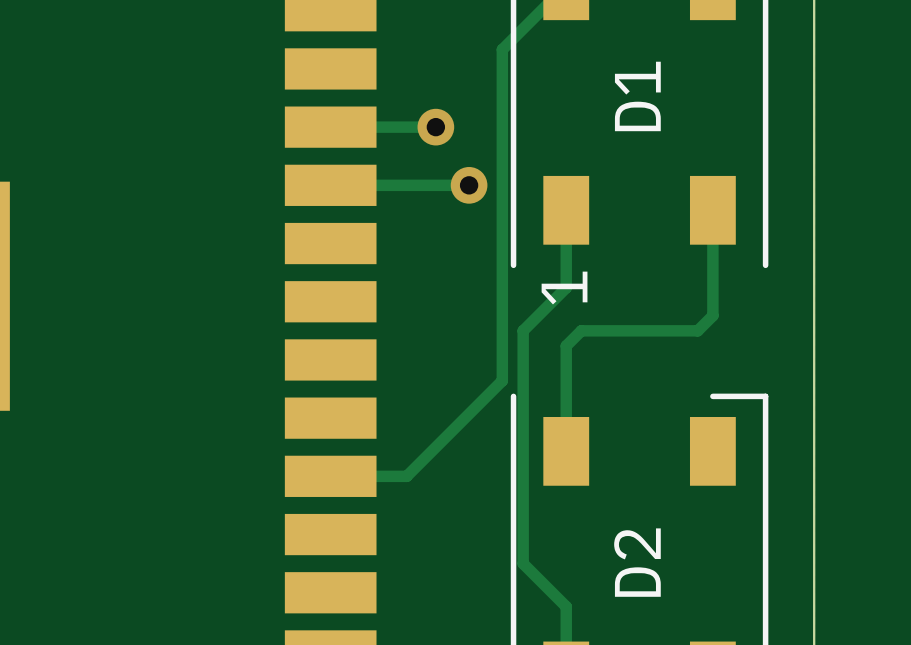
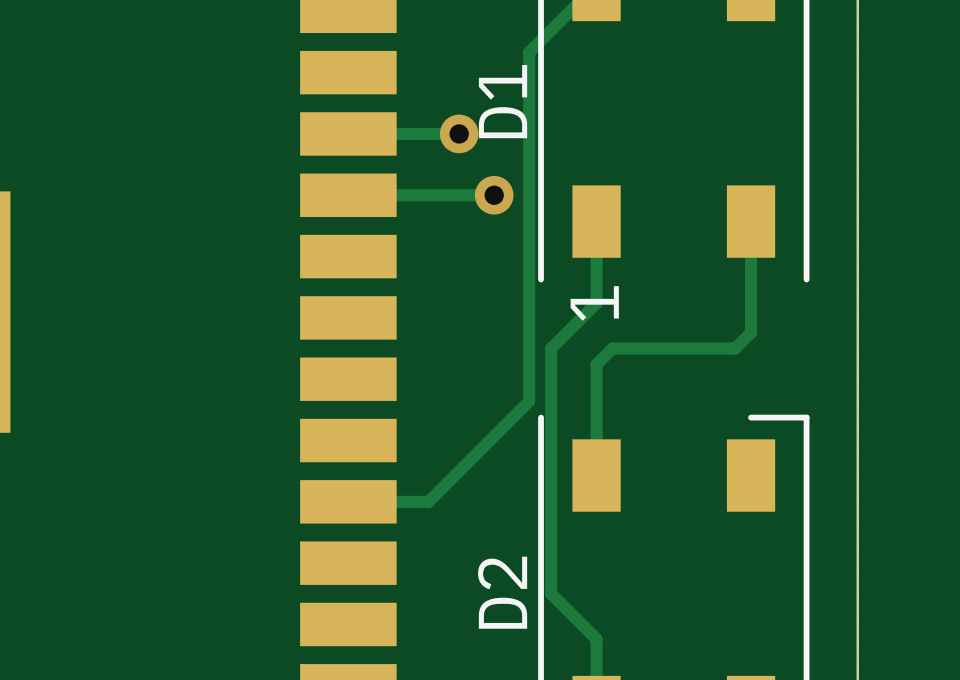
D1 name position: D1 (637, 96) -> D1 (503, 101)
D2 name position: D2 (637, 562) -> D2 (502, 592)

